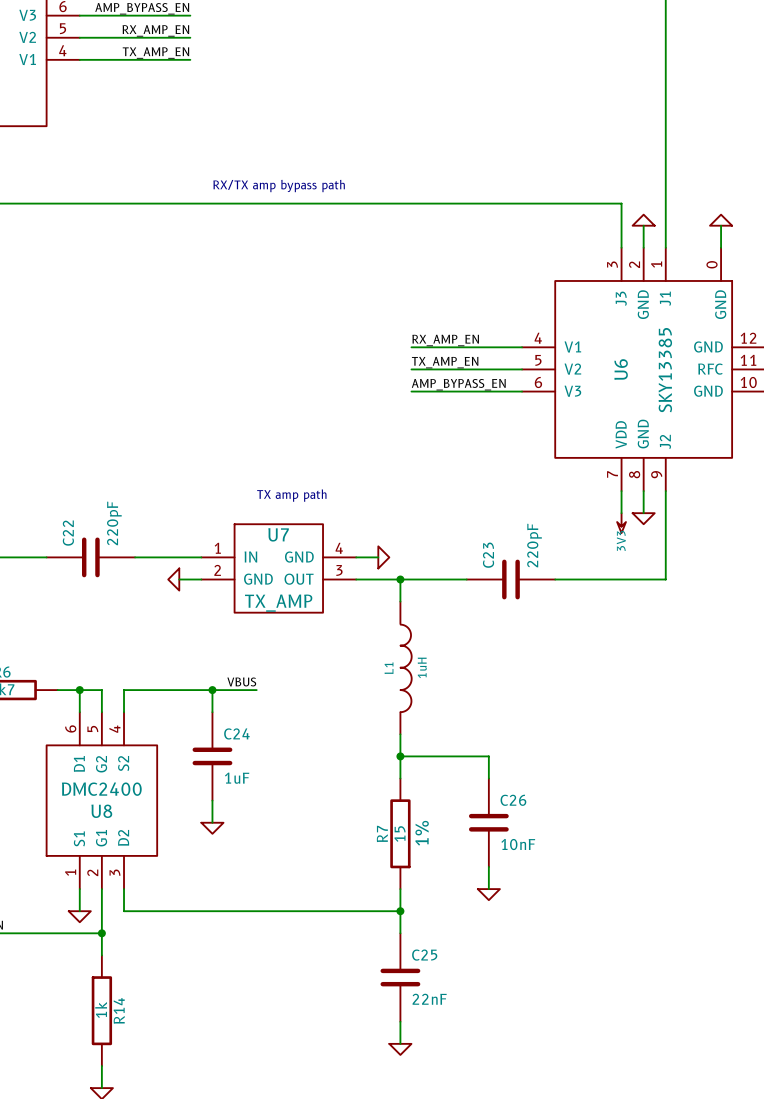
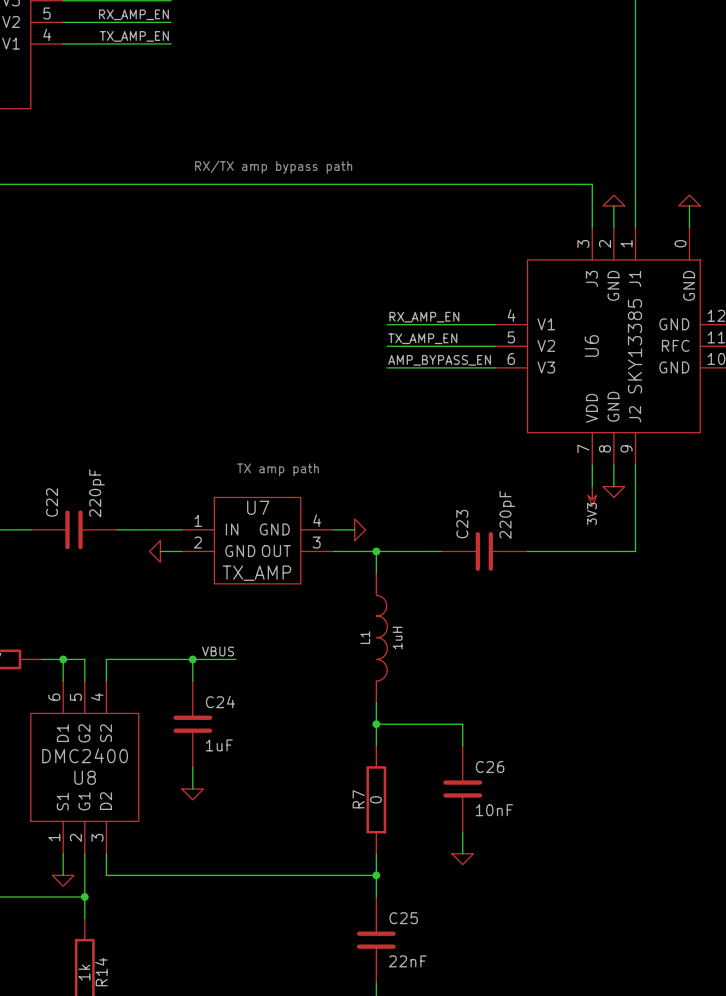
R7 text: 1% (422, 833) -> none
R7 value: 15 (400, 834) -> 0 (375, 799)

